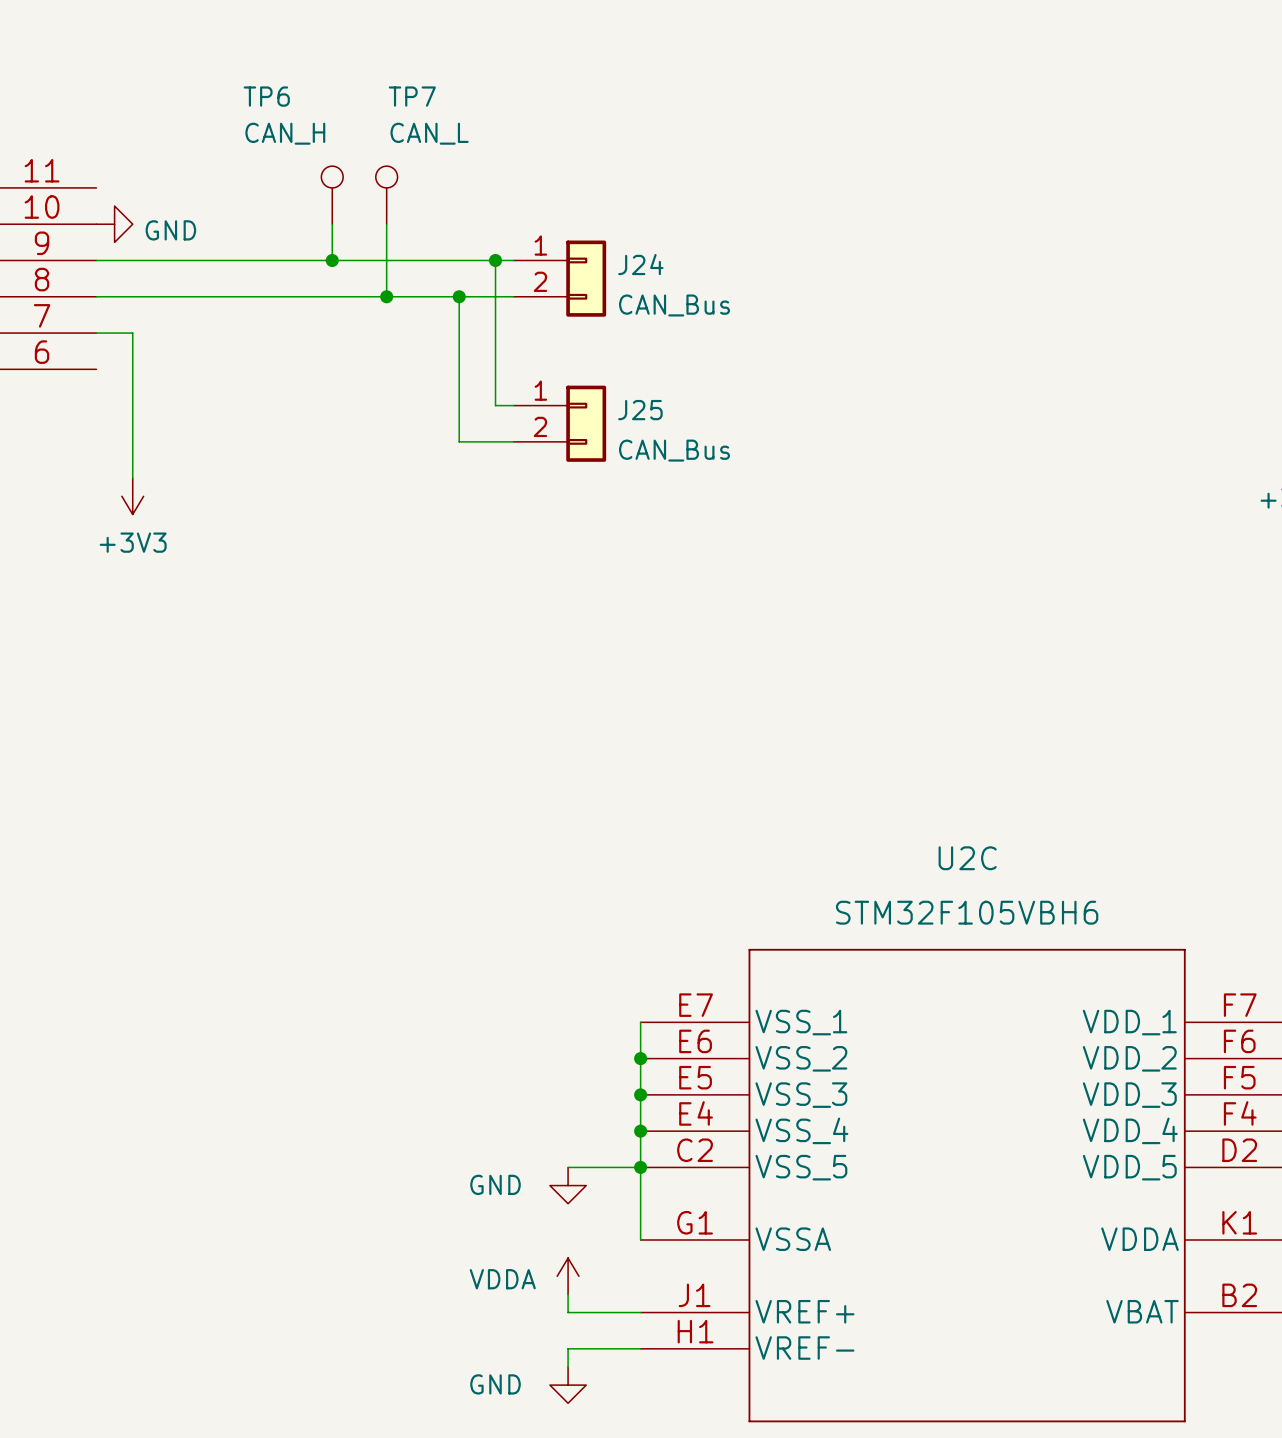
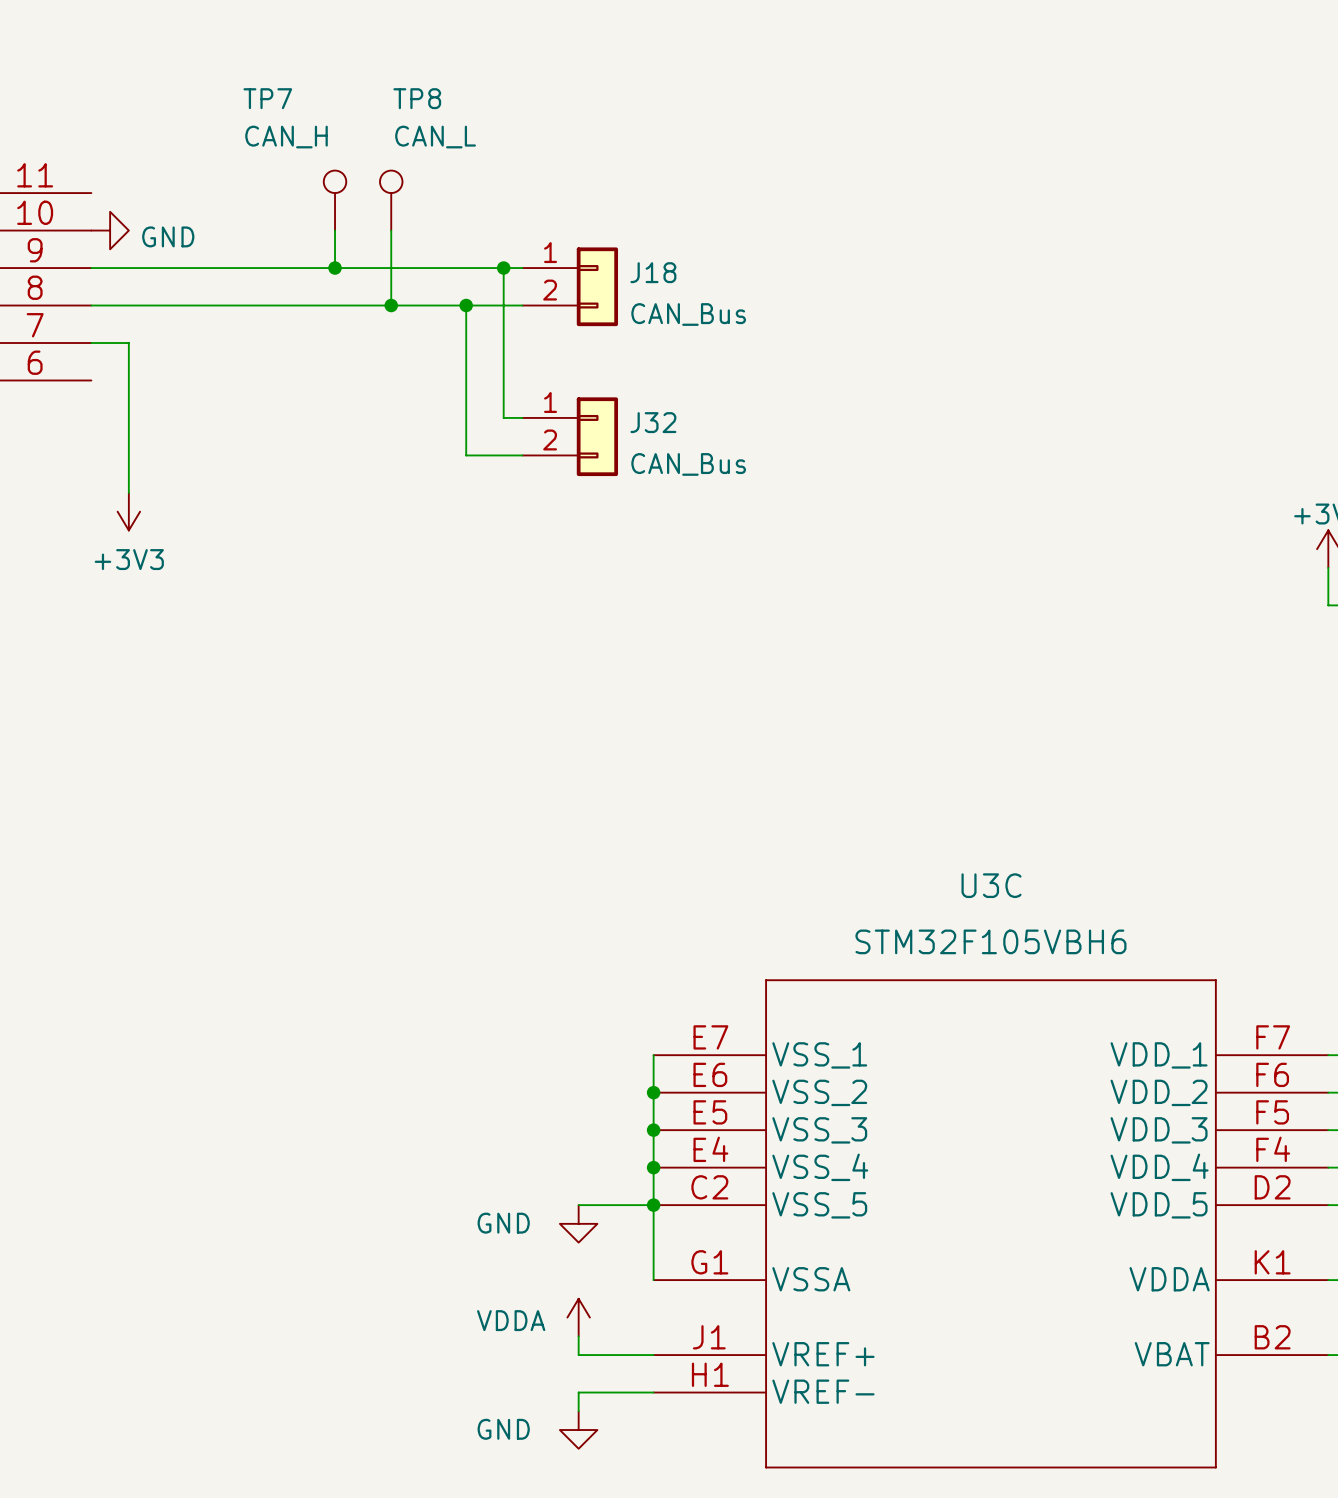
TP6 name: TP6 (266, 96) -> TP7 (267, 98)
TP7 name: TP7 (412, 96) -> TP8 (417, 98)
J24 name: J24 (640, 264) -> J18 (653, 272)
J25 name: J25 (640, 410) -> J32 (653, 422)
U2C name: U2C (967, 858) -> U3C (991, 885)

